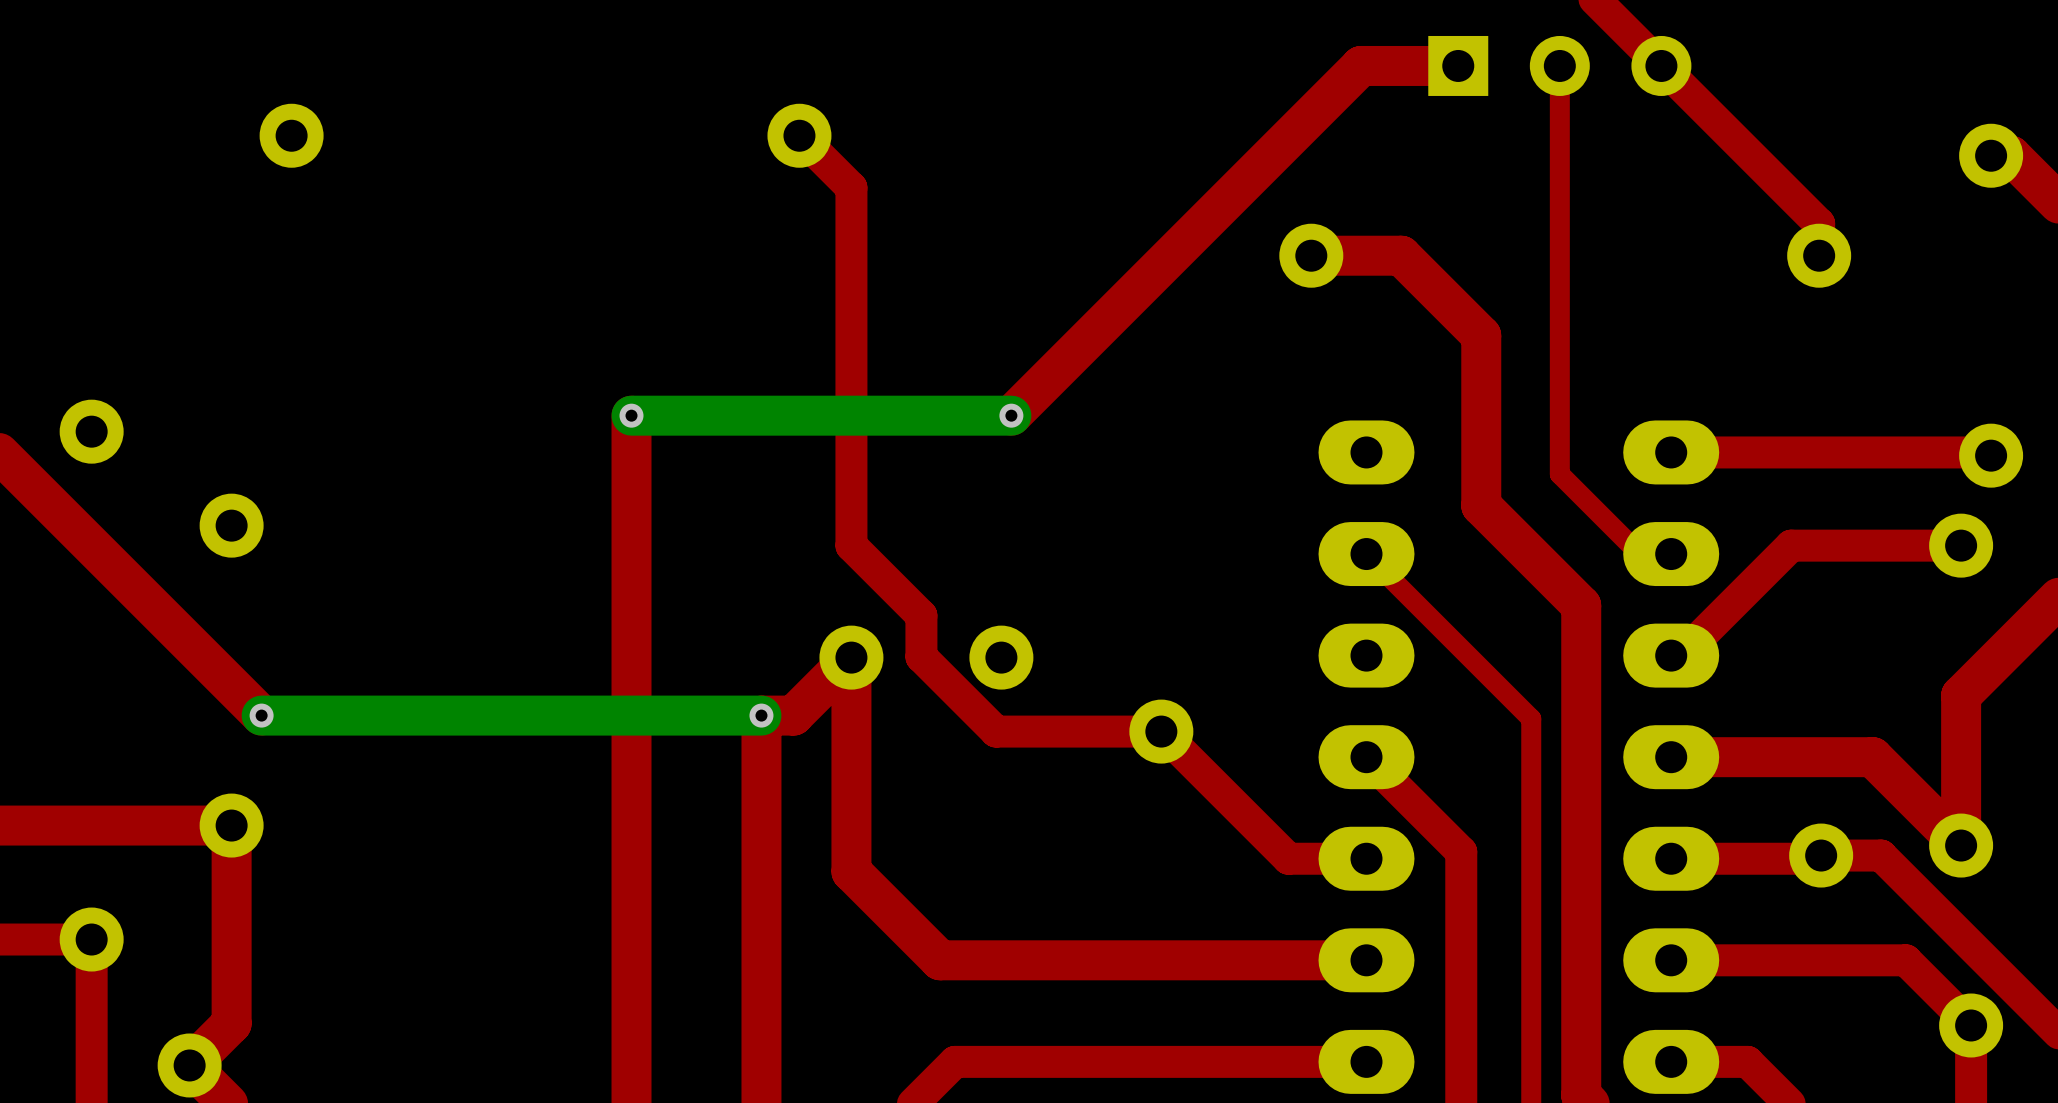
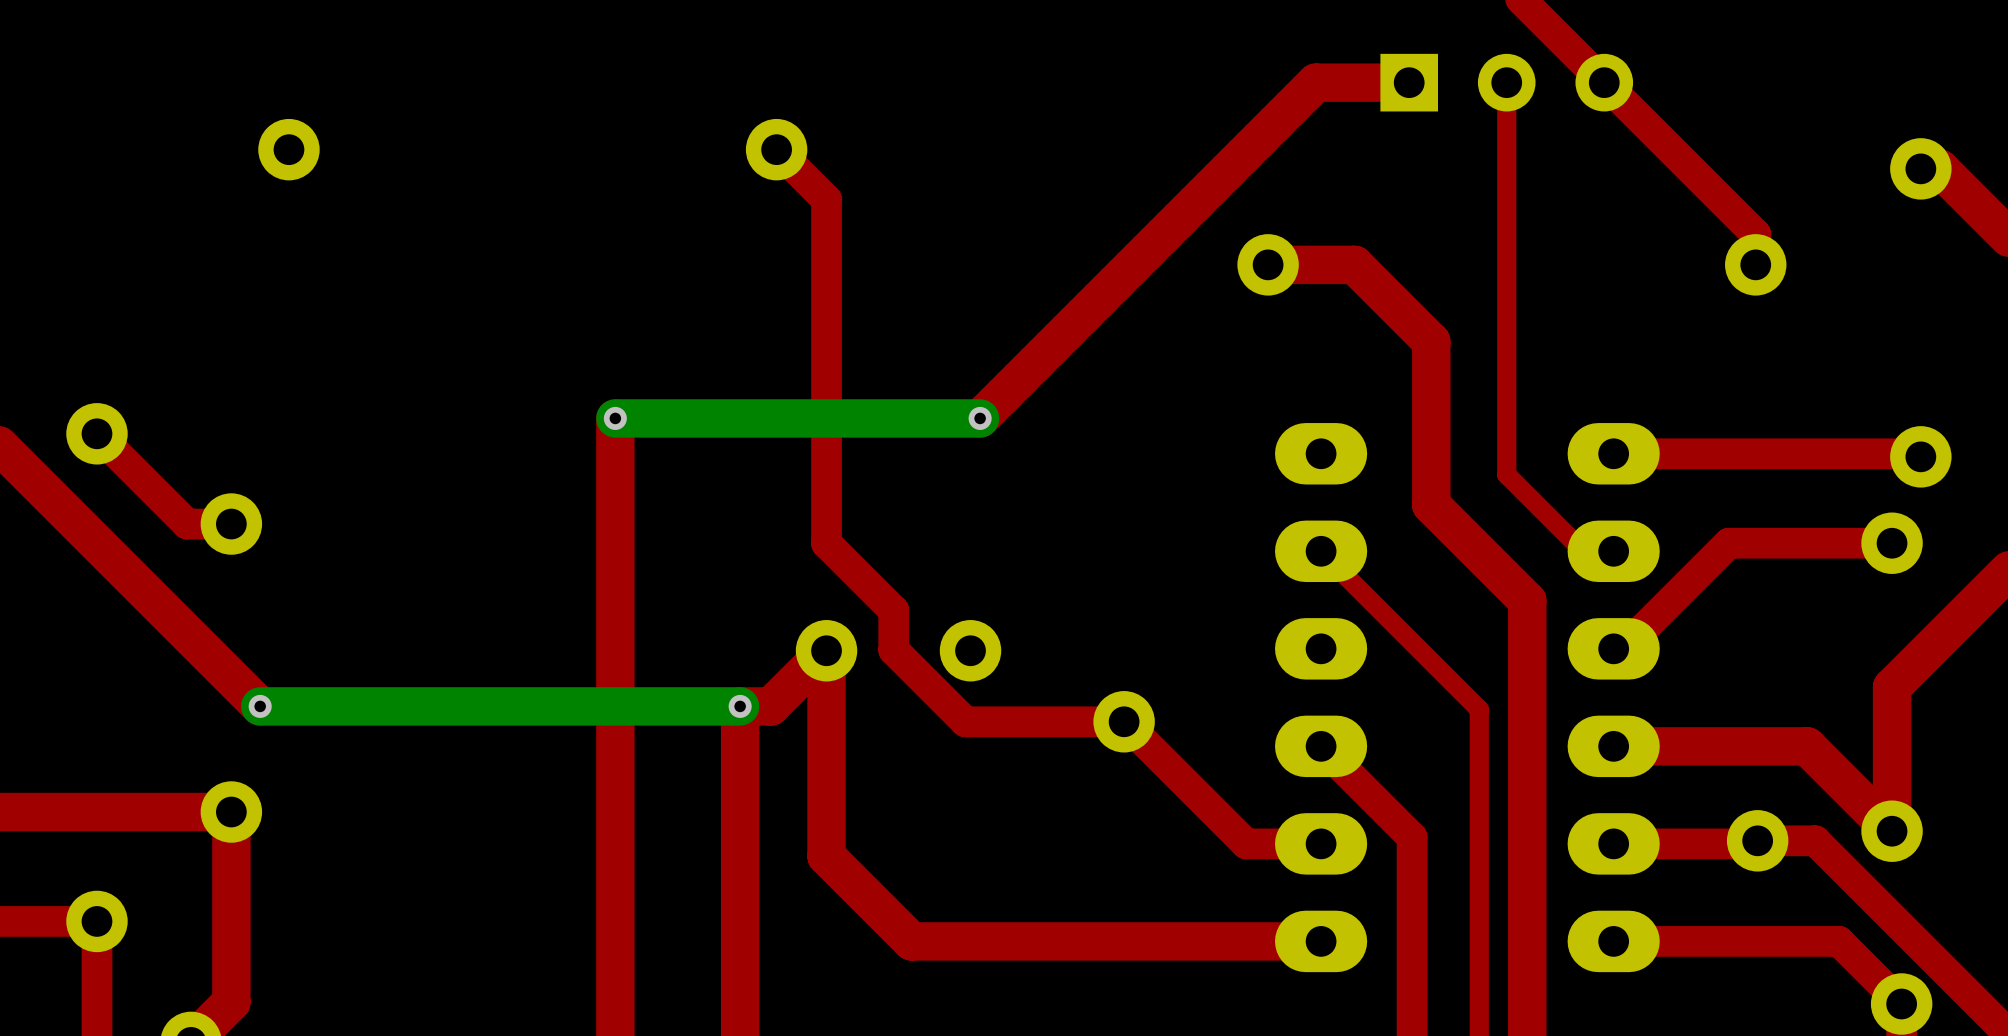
top track: none -> (96, 433) (187, 524) (231, 524)

